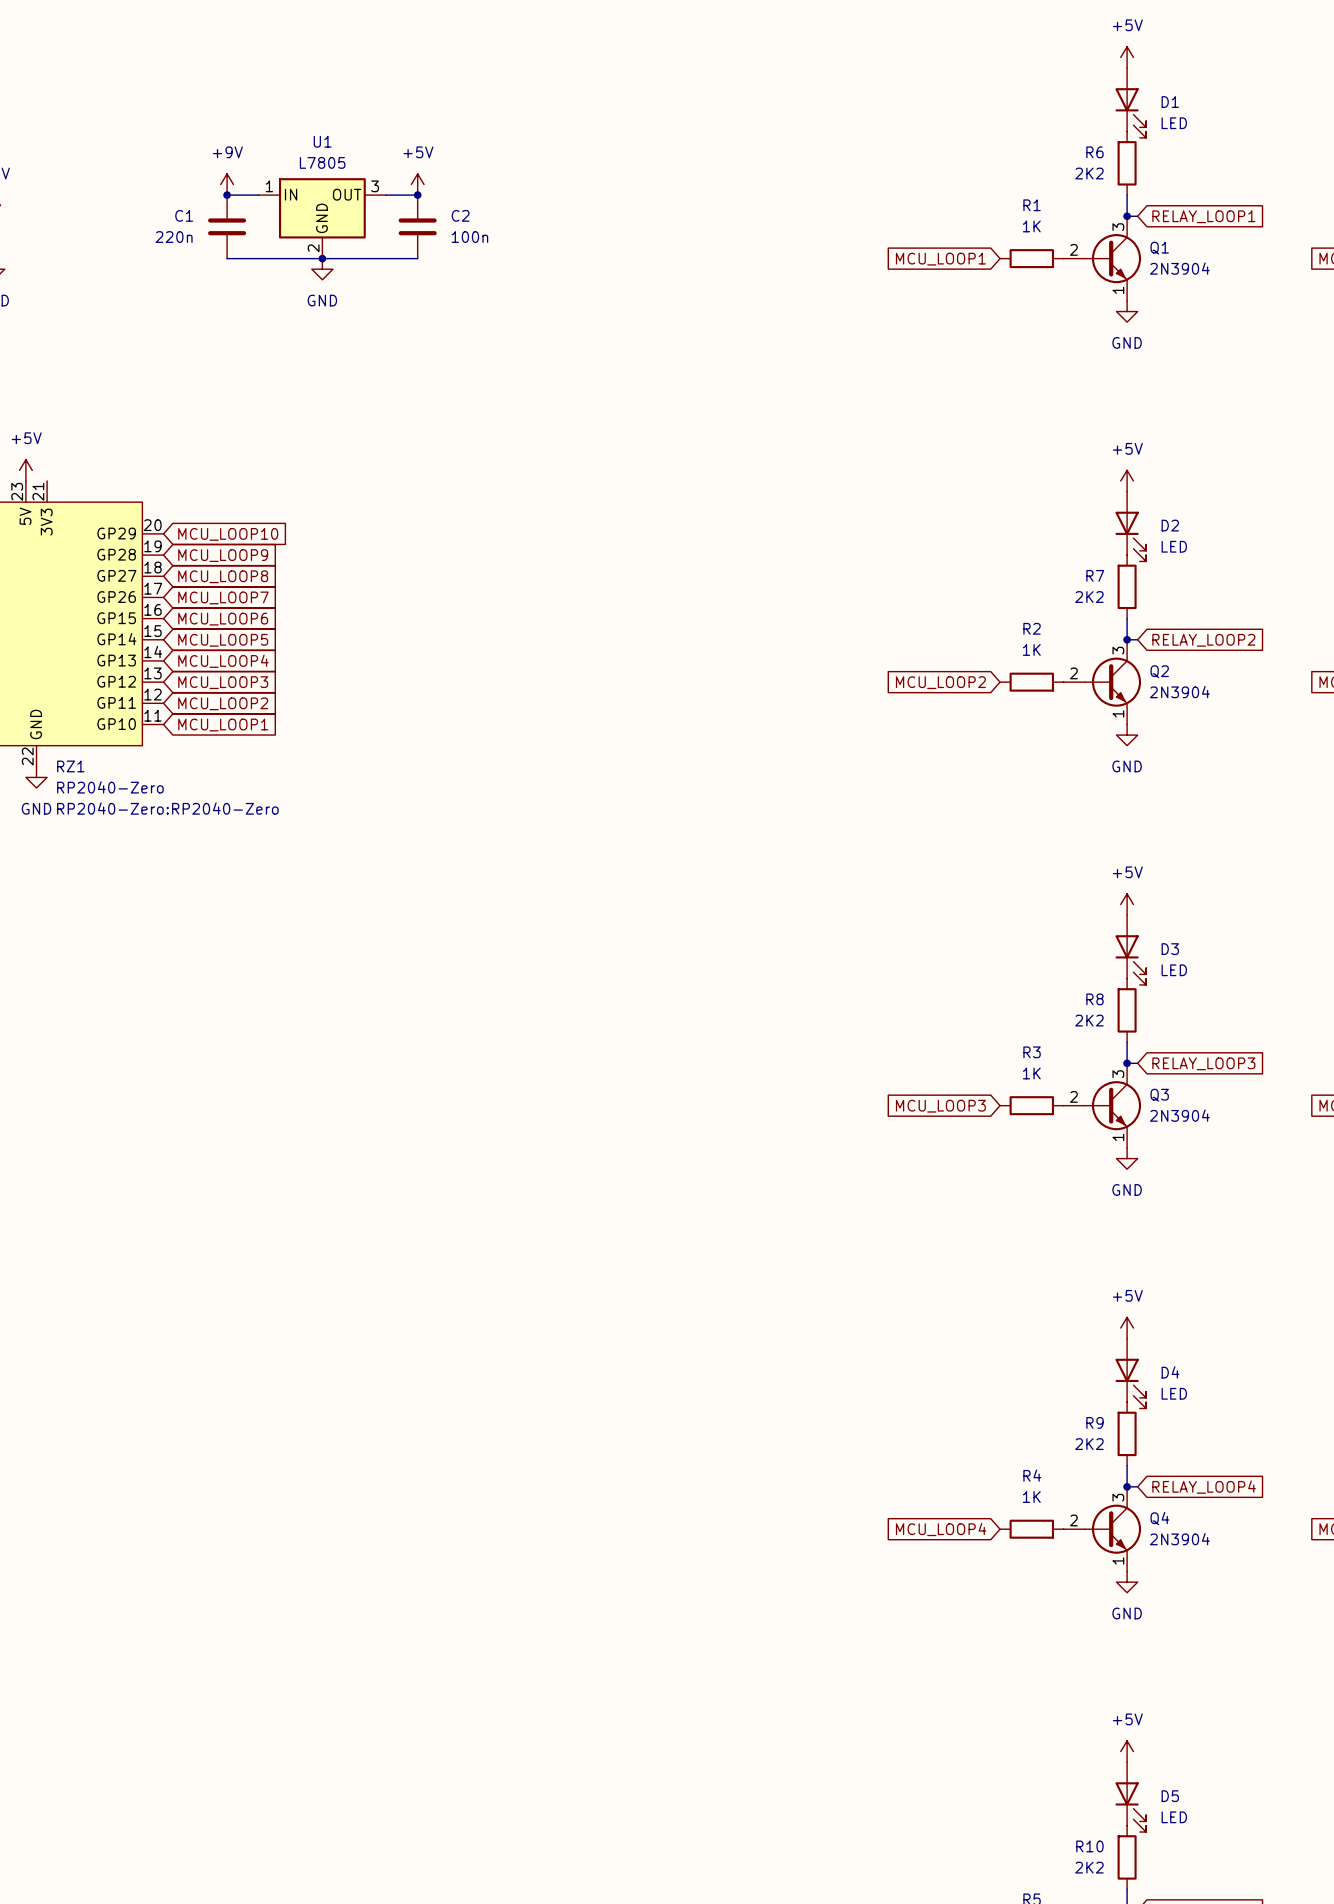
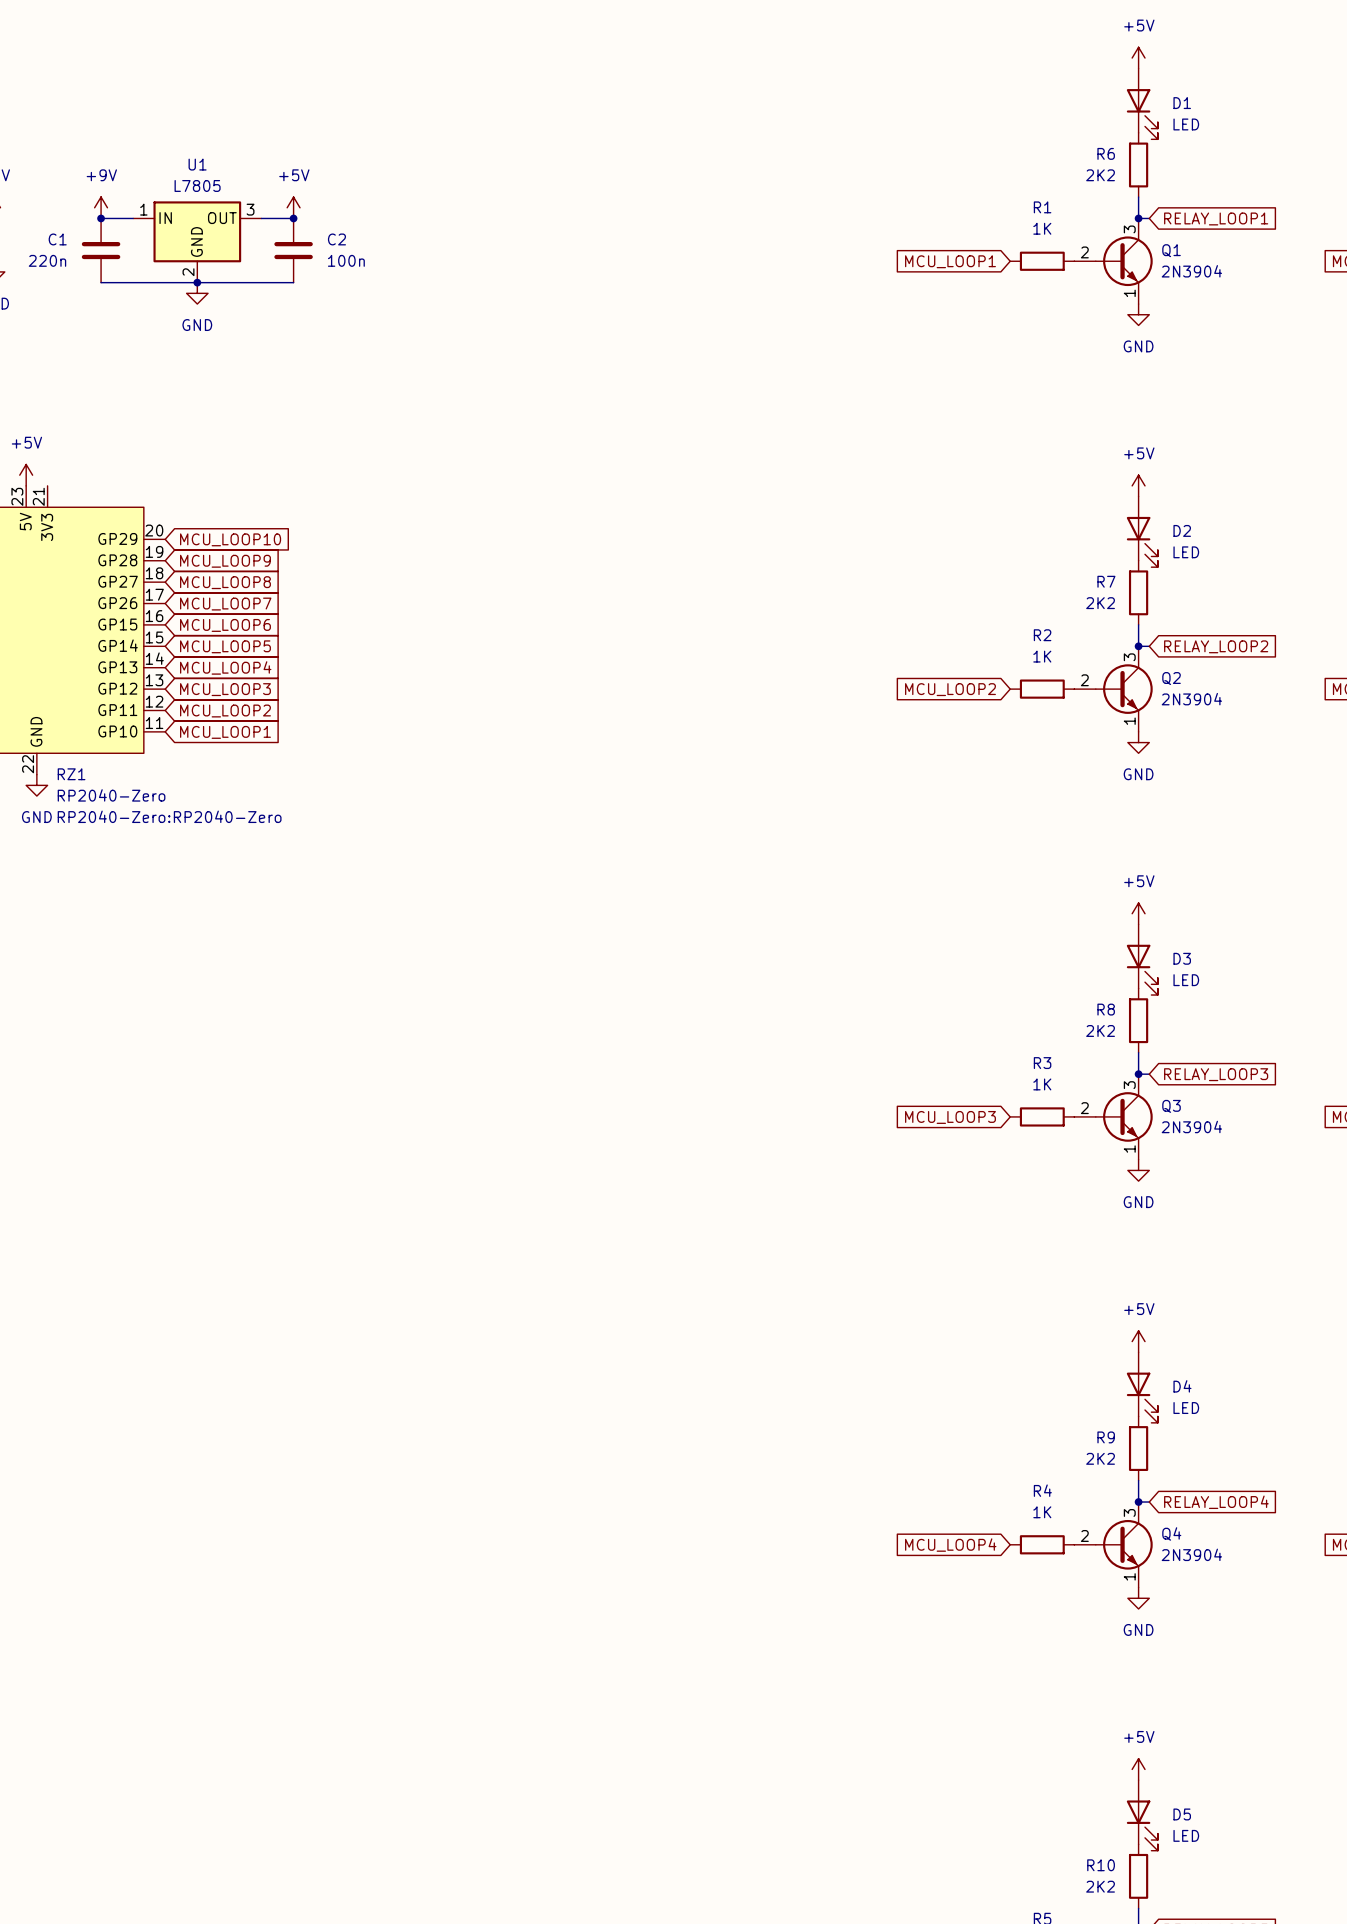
power symbol position: +9V (227, 184) -> +9V (101, 207)
power symbol position: +5V (417, 184) -> +5V (293, 207)
wire: (227, 195) (258, 195) -> (101, 218) (133, 218)
junction: (227, 195) -> none
wire: (385, 195) (417, 195) -> (261, 218) (293, 218)
junction: (417, 195) -> none
junction: none -> (101, 218)
junction: none -> (293, 218)
U1 position: (322, 218) -> (197, 242)
C1 position: (227, 226) -> (101, 250)
C2 position: (417, 226) -> (293, 250)
wire: (227, 258) (417, 258) -> (101, 282) (293, 282)
junction: (322, 258) -> none
power symbol position: GND (322, 269) -> GND (197, 293)
junction: none -> (197, 282)

